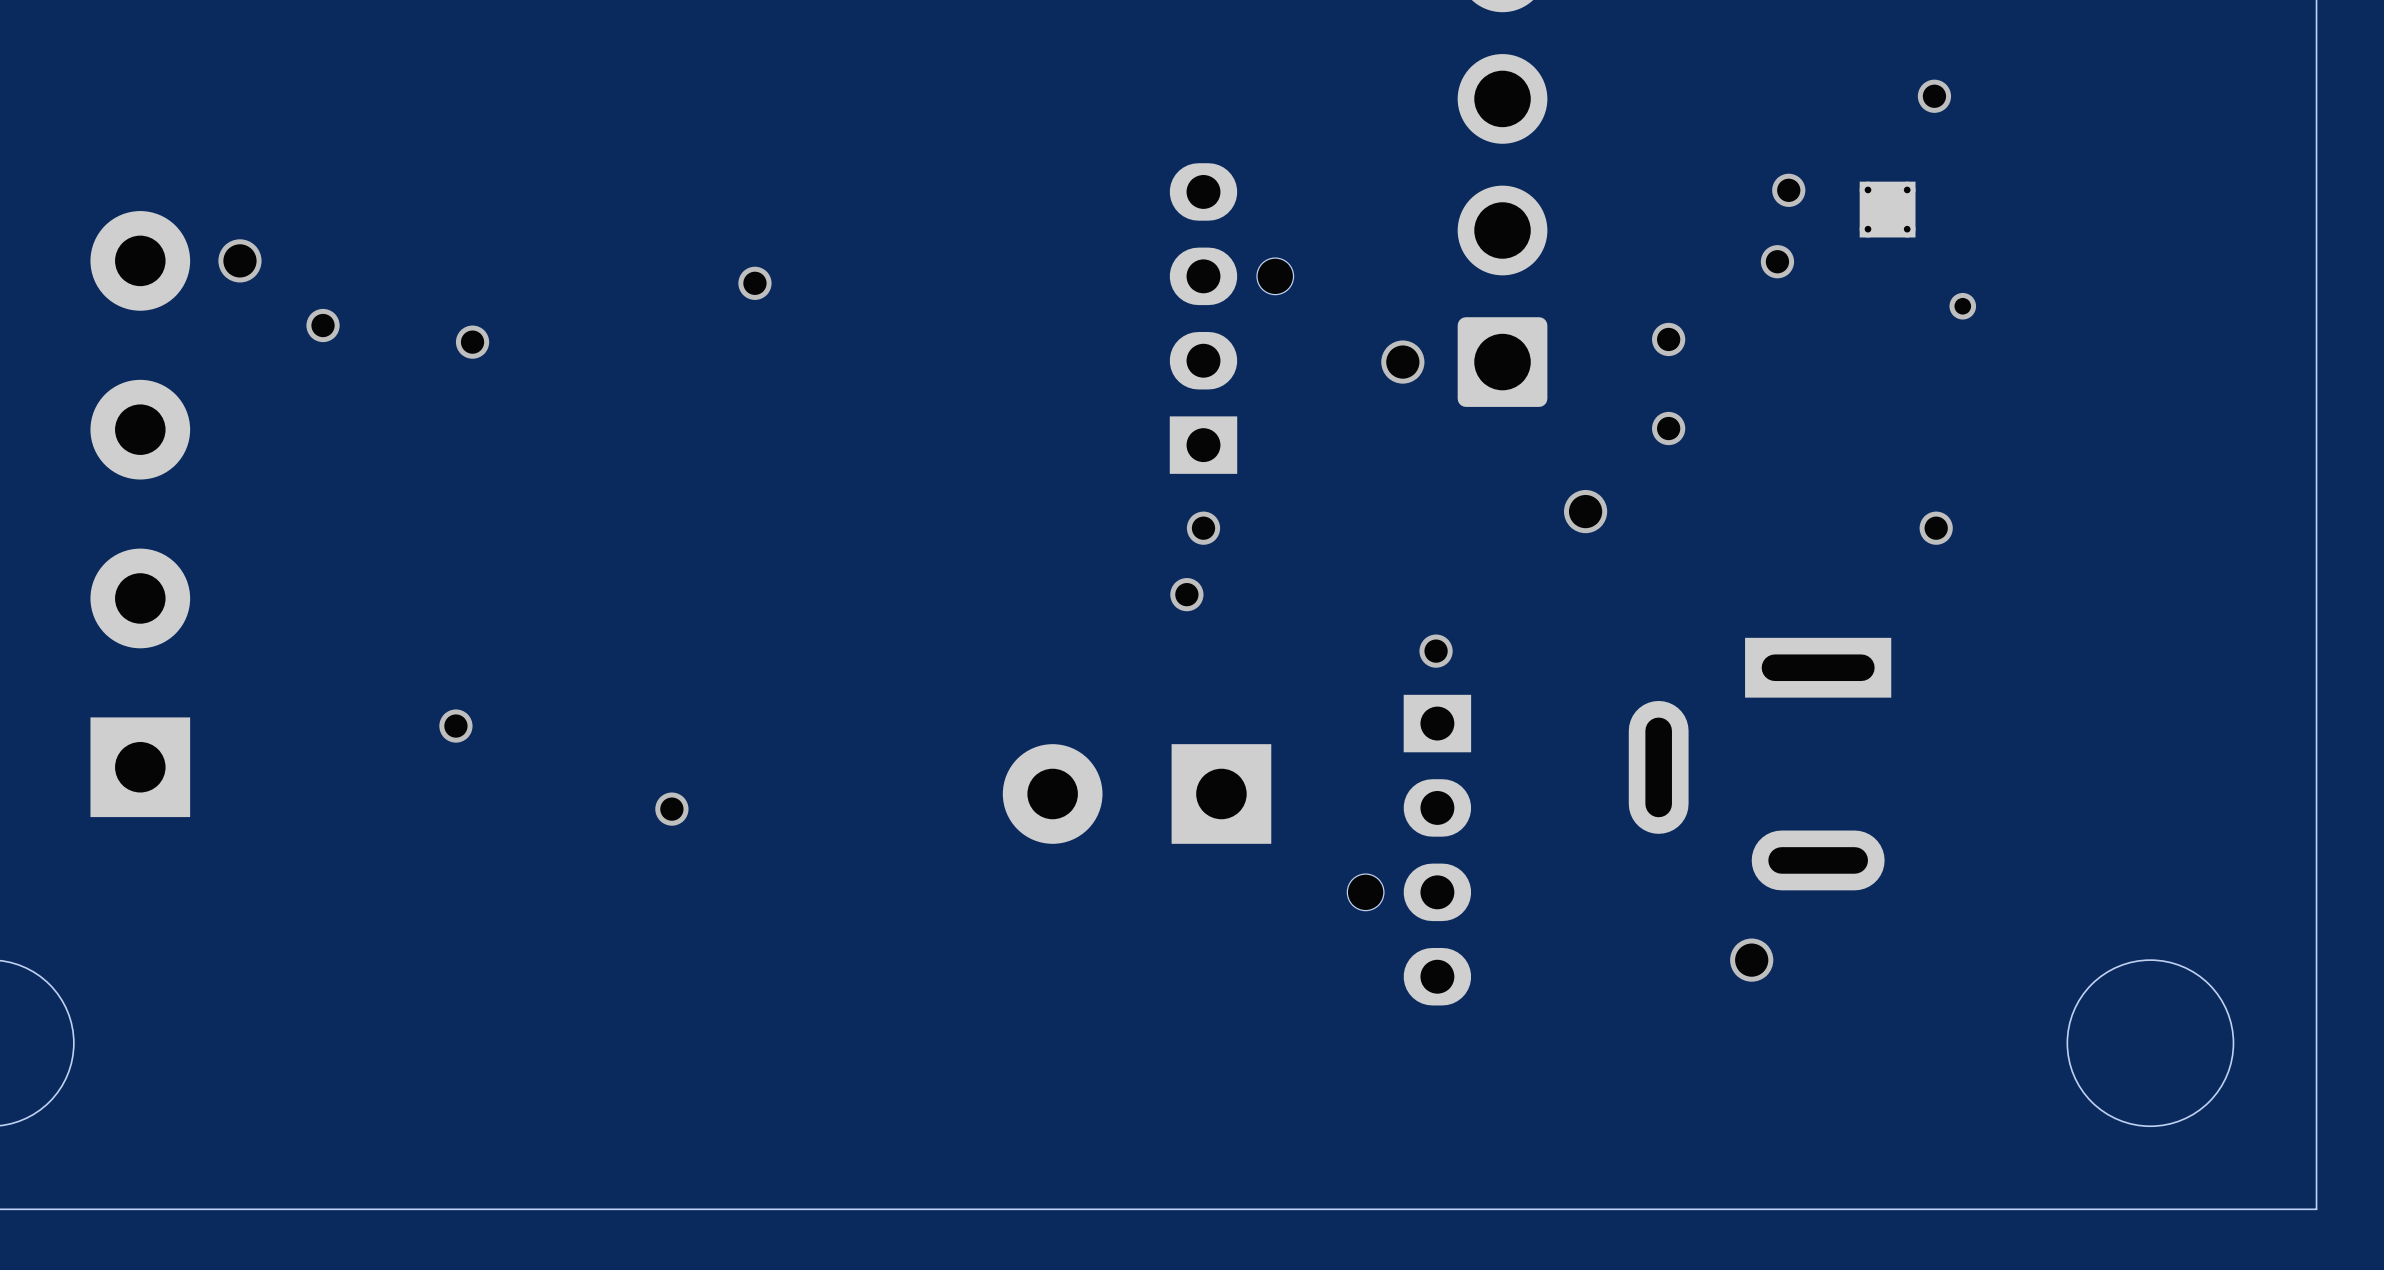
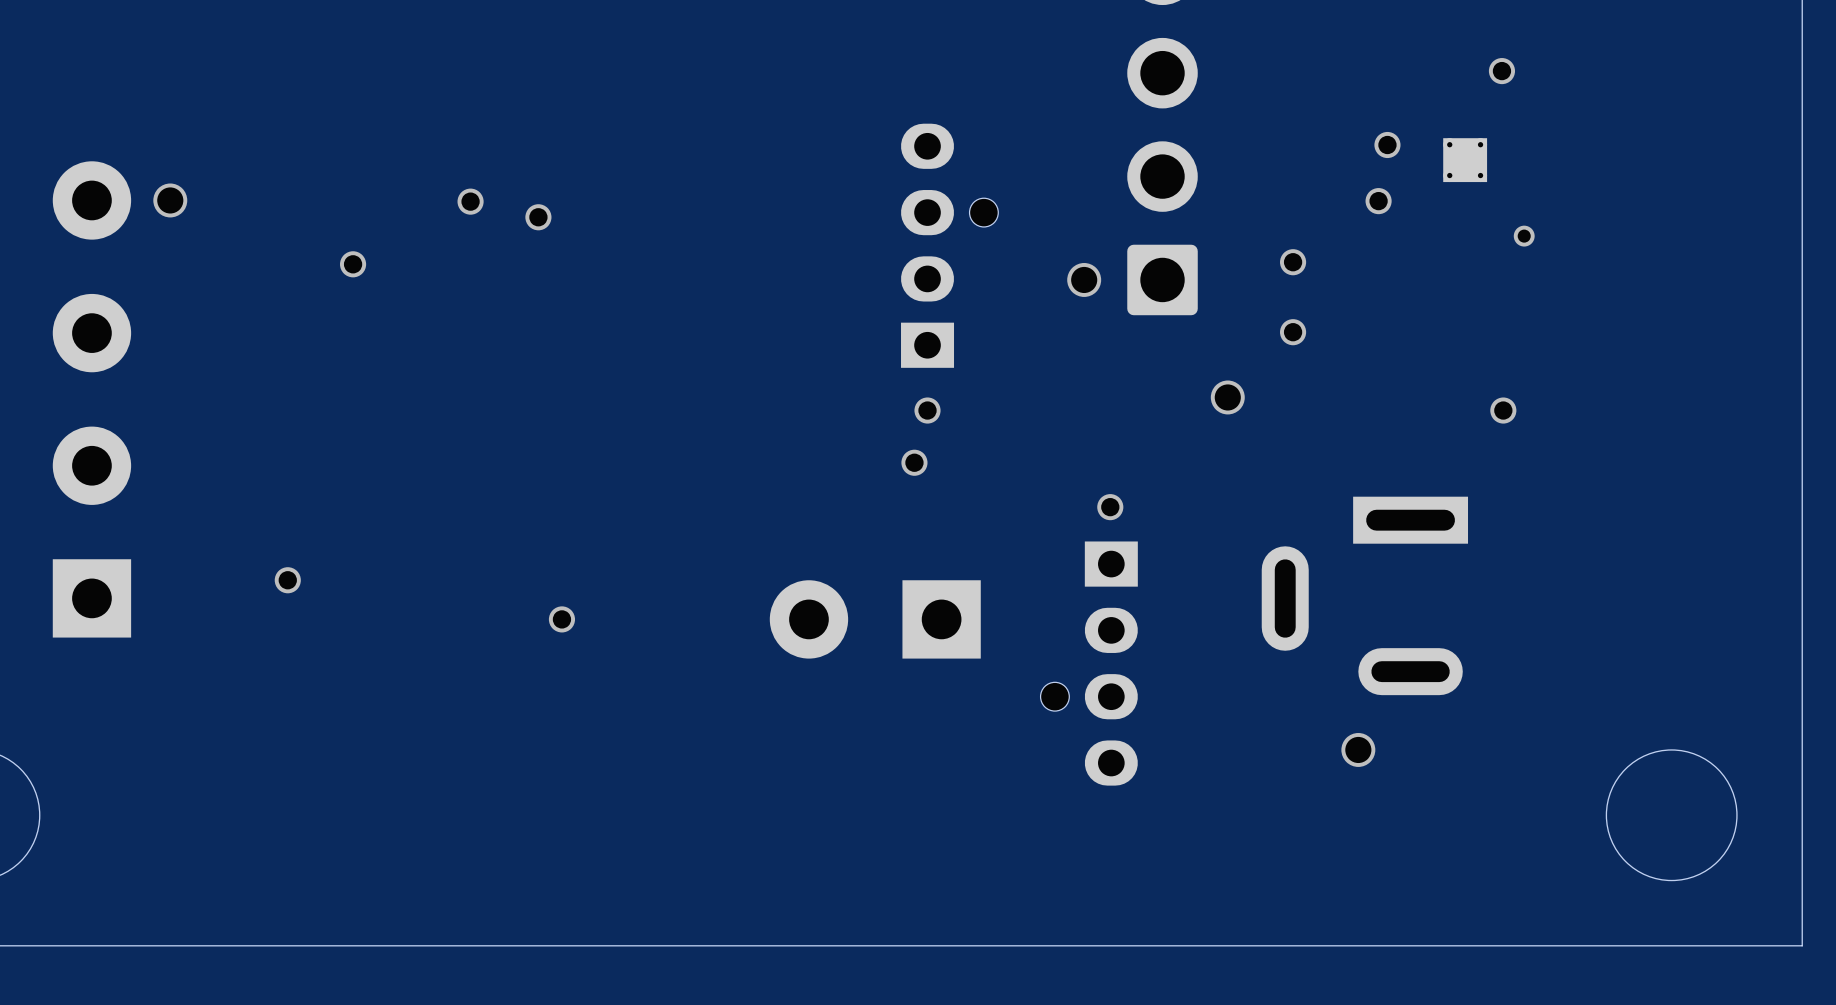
via: none -> (470, 201)
via position: (754, 283) -> (538, 217)
via: (323, 325) -> none
via position: (455, 726) -> (287, 580)
via position: (671, 809) -> (561, 619)

